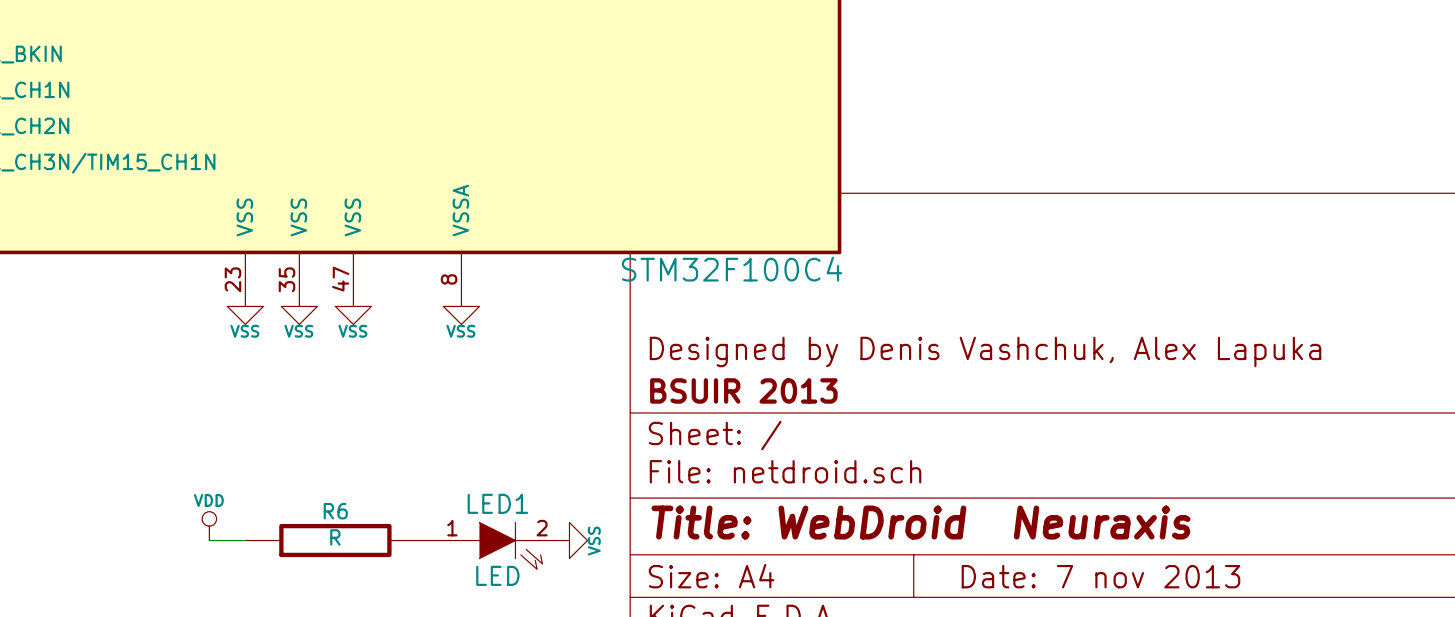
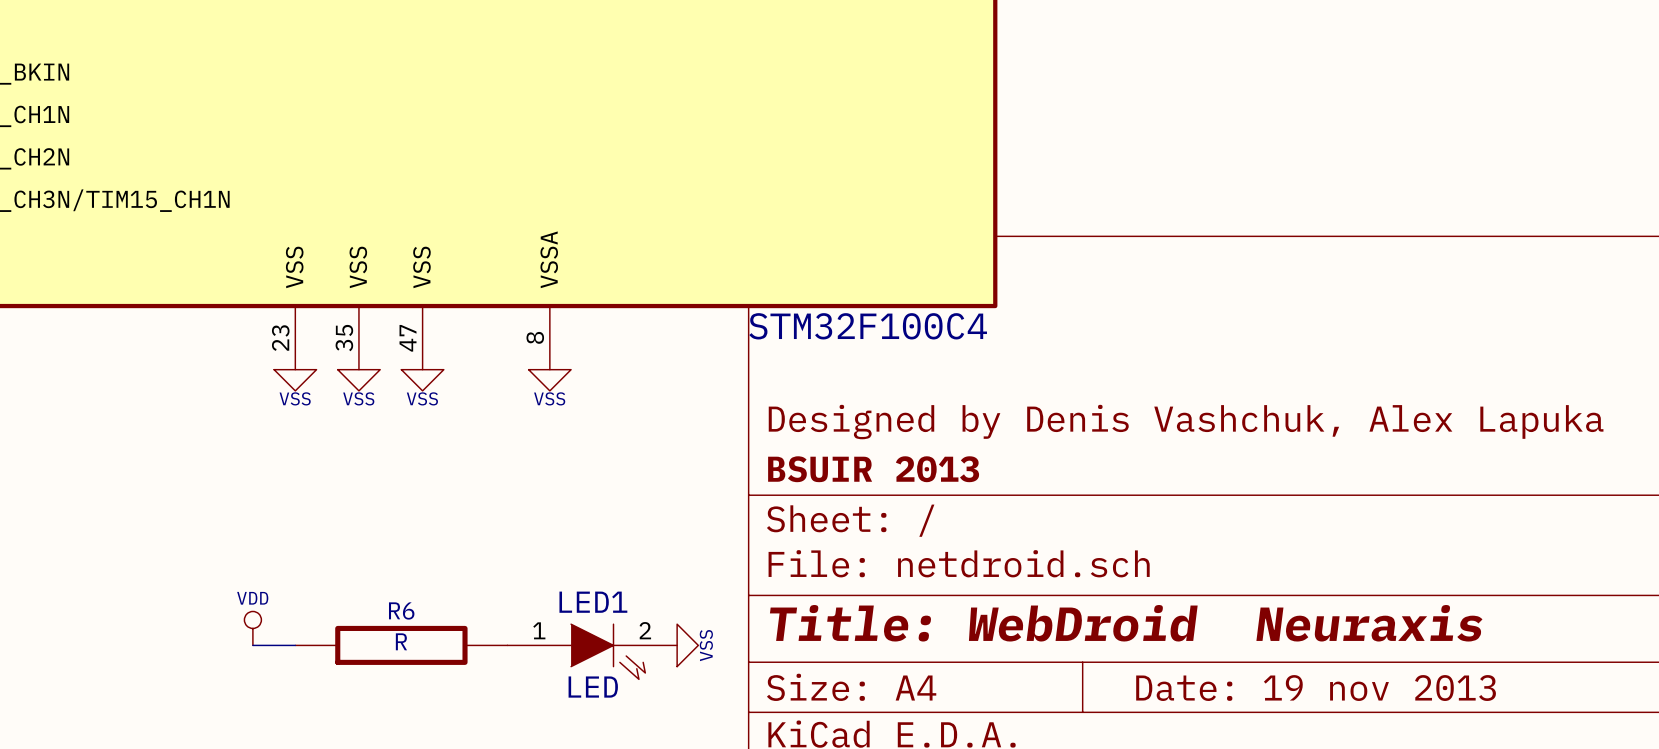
title block: Date: 7 nov 2013 (1100, 576) -> Date: 19 nov 2013 (1316, 688)

